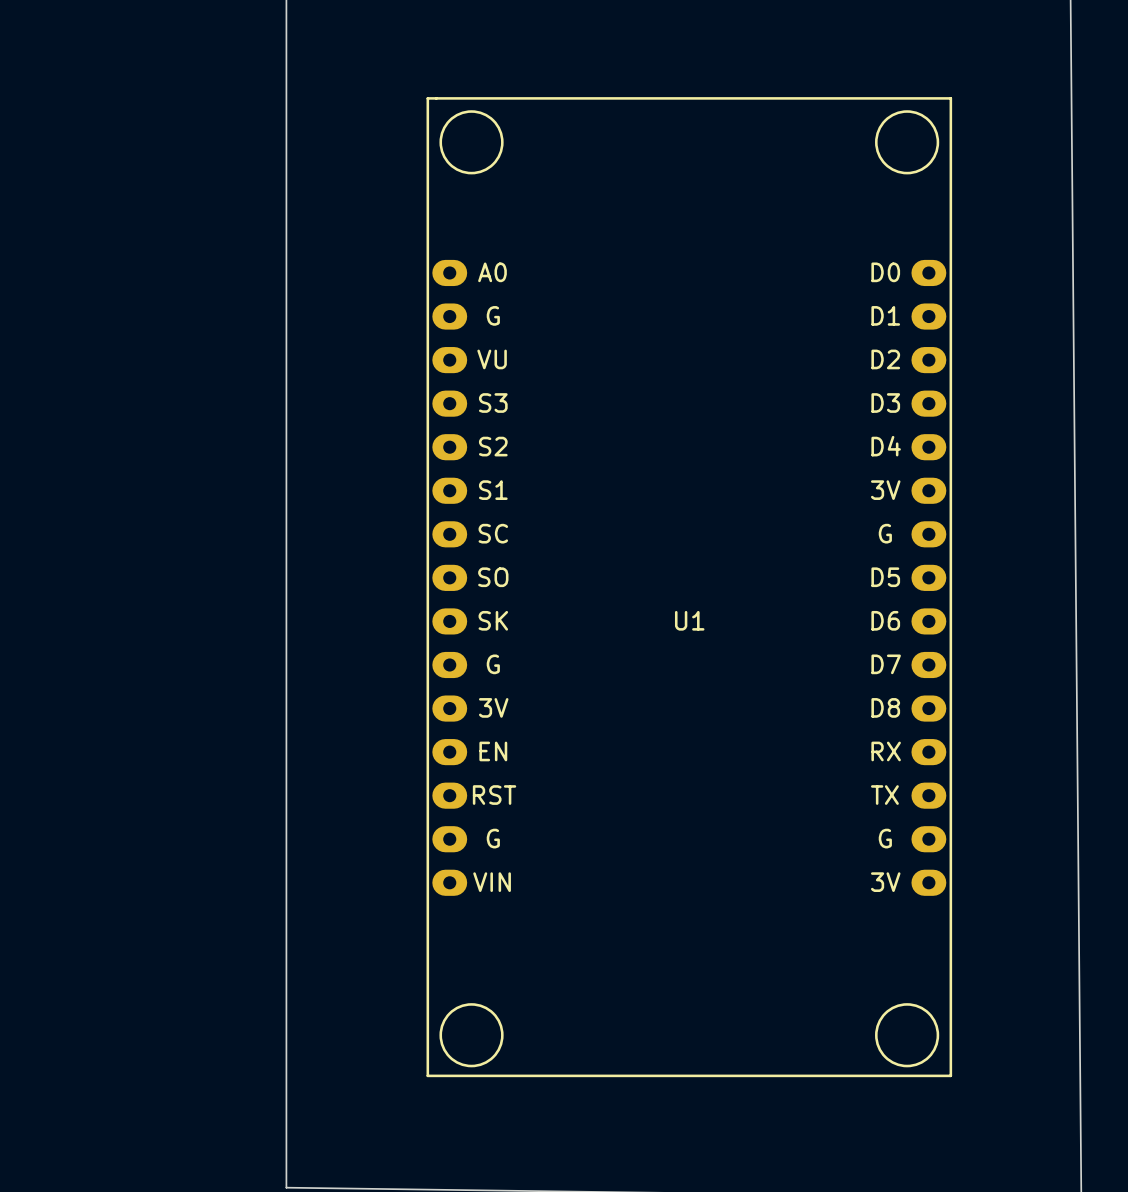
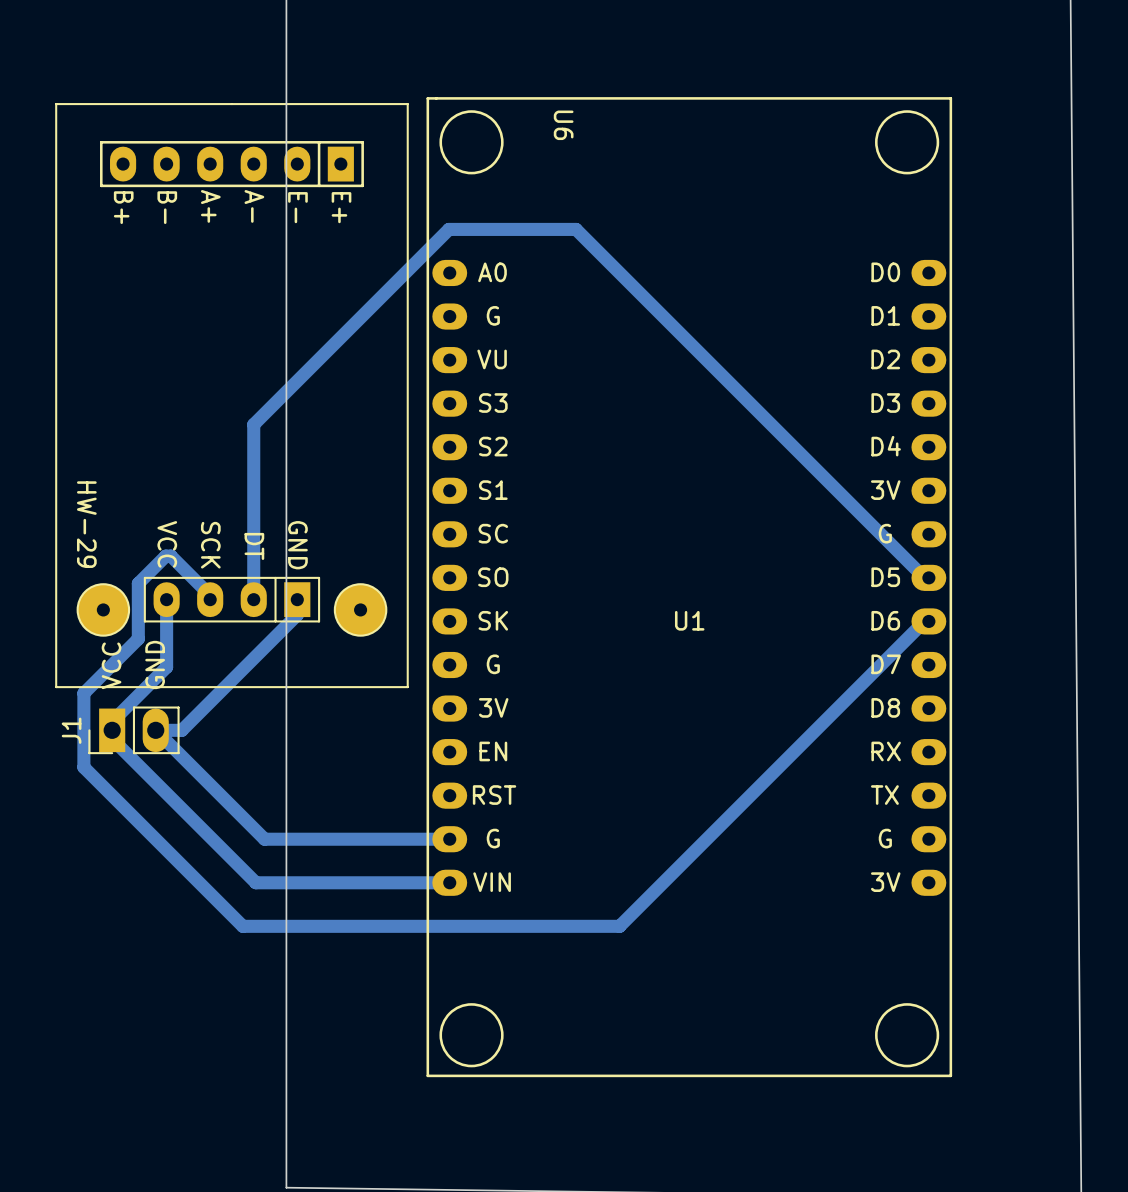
U6: none -> (231, 395)
bottom track: none -> (928, 577) (924, 577) (576, 229) (448, 229) (253, 424) (253, 599)
bottom track: none -> (166, 599) (166, 667) (112, 721) (112, 739) (255, 882) (449, 882)
bottom track: none -> (210, 599) (210, 595) (170, 556) (165, 556) (138, 583) (138, 638) (83, 693) (83, 767) (242, 926) (619, 926) (924, 621) (928, 621)
bottom track: none -> (297, 599) (297, 614) (181, 730) (155, 730) (264, 839) (449, 839)
J1: none -> (133, 730)

